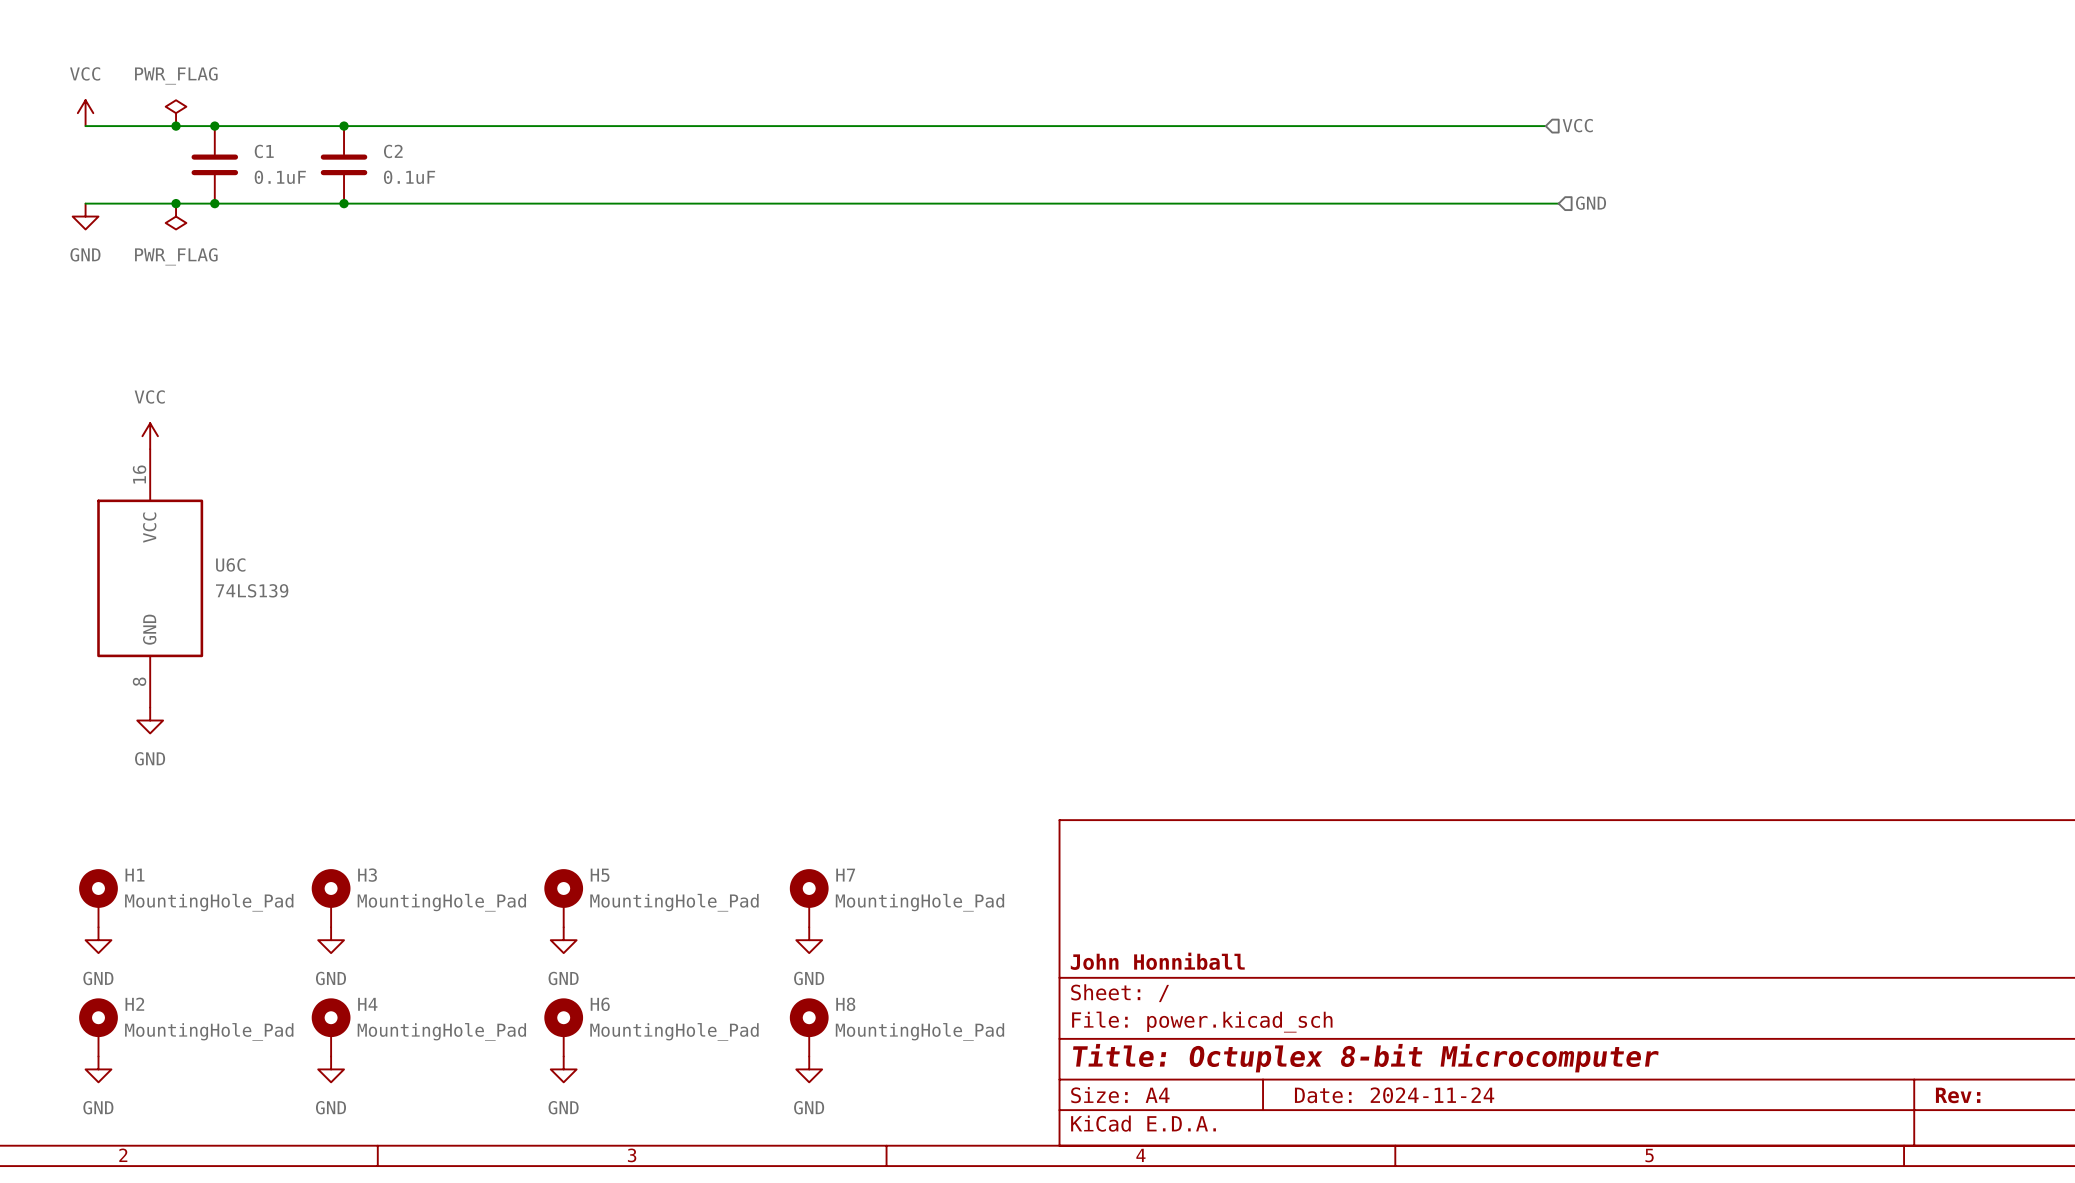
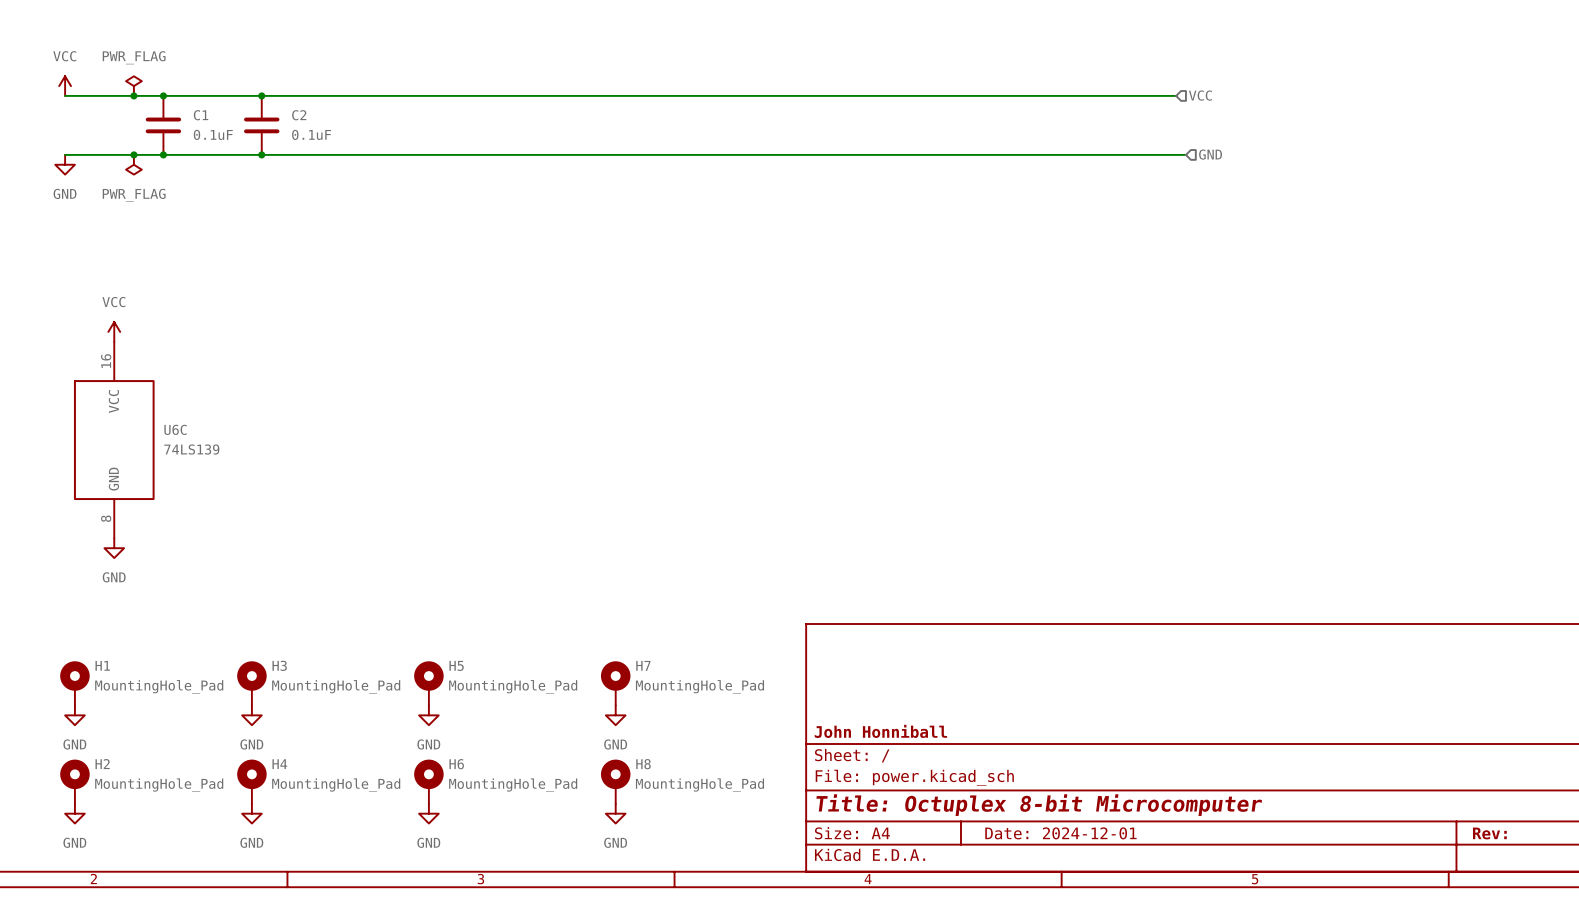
title block: Date: 2024-11-24 (1394, 1095) -> Date: 2024-12-01 (1060, 833)

